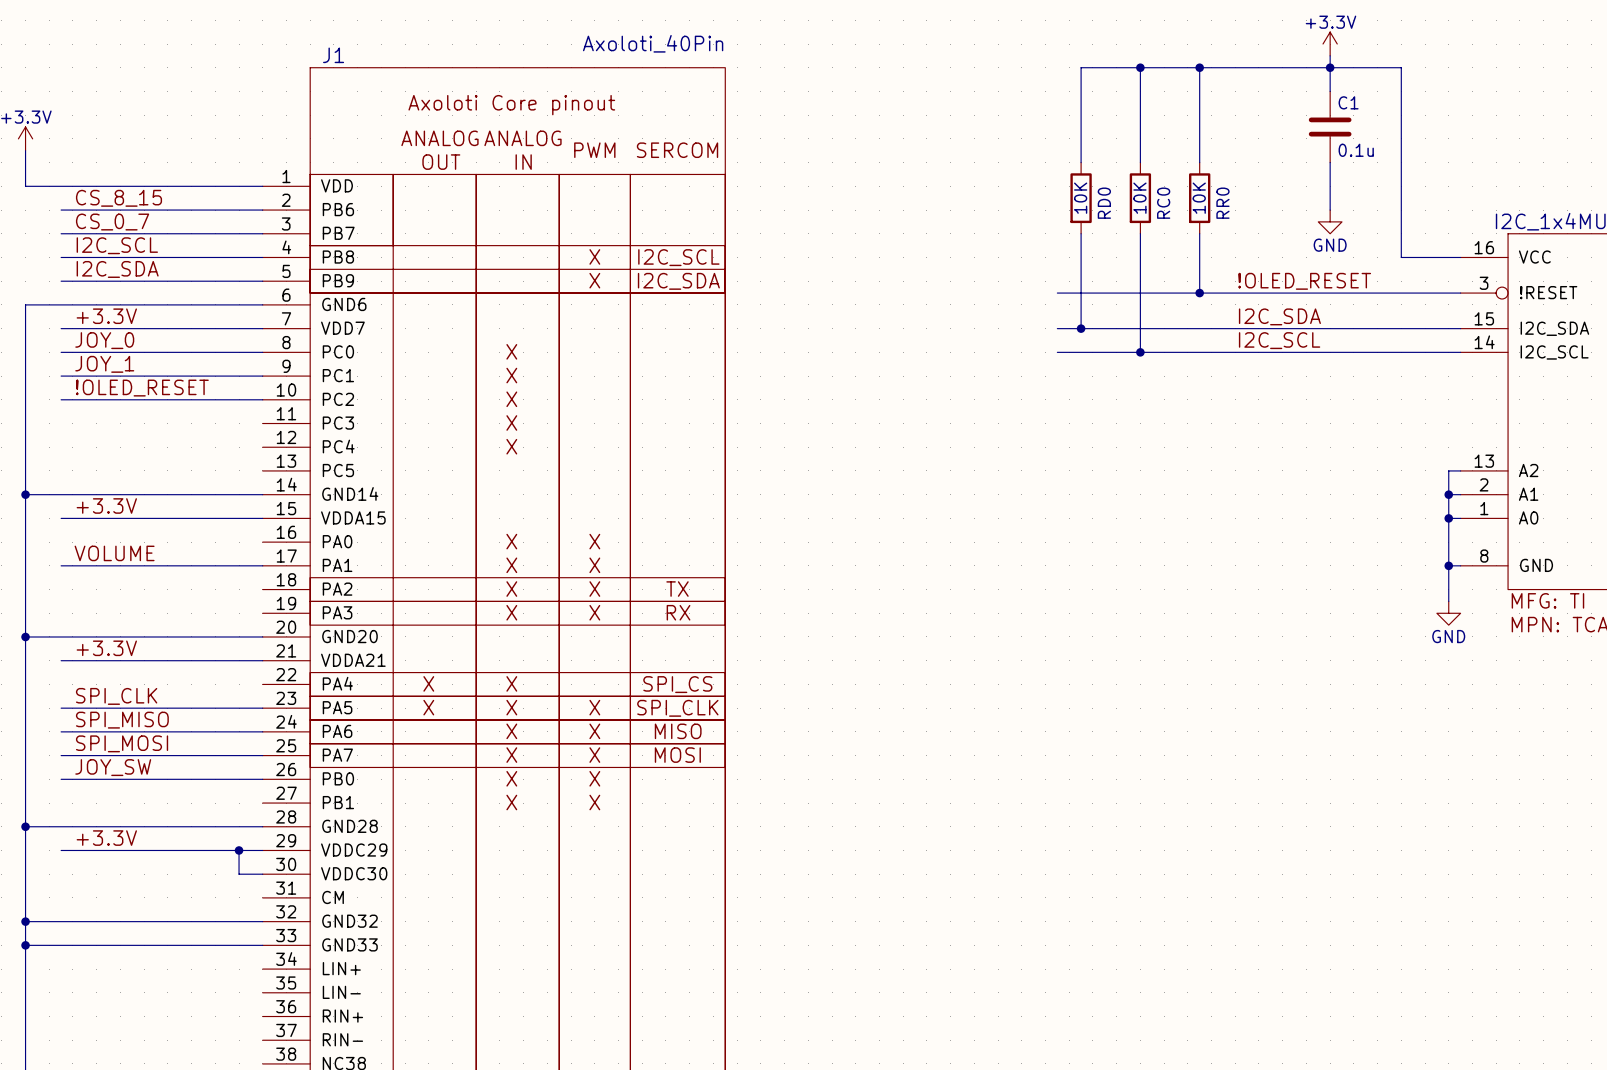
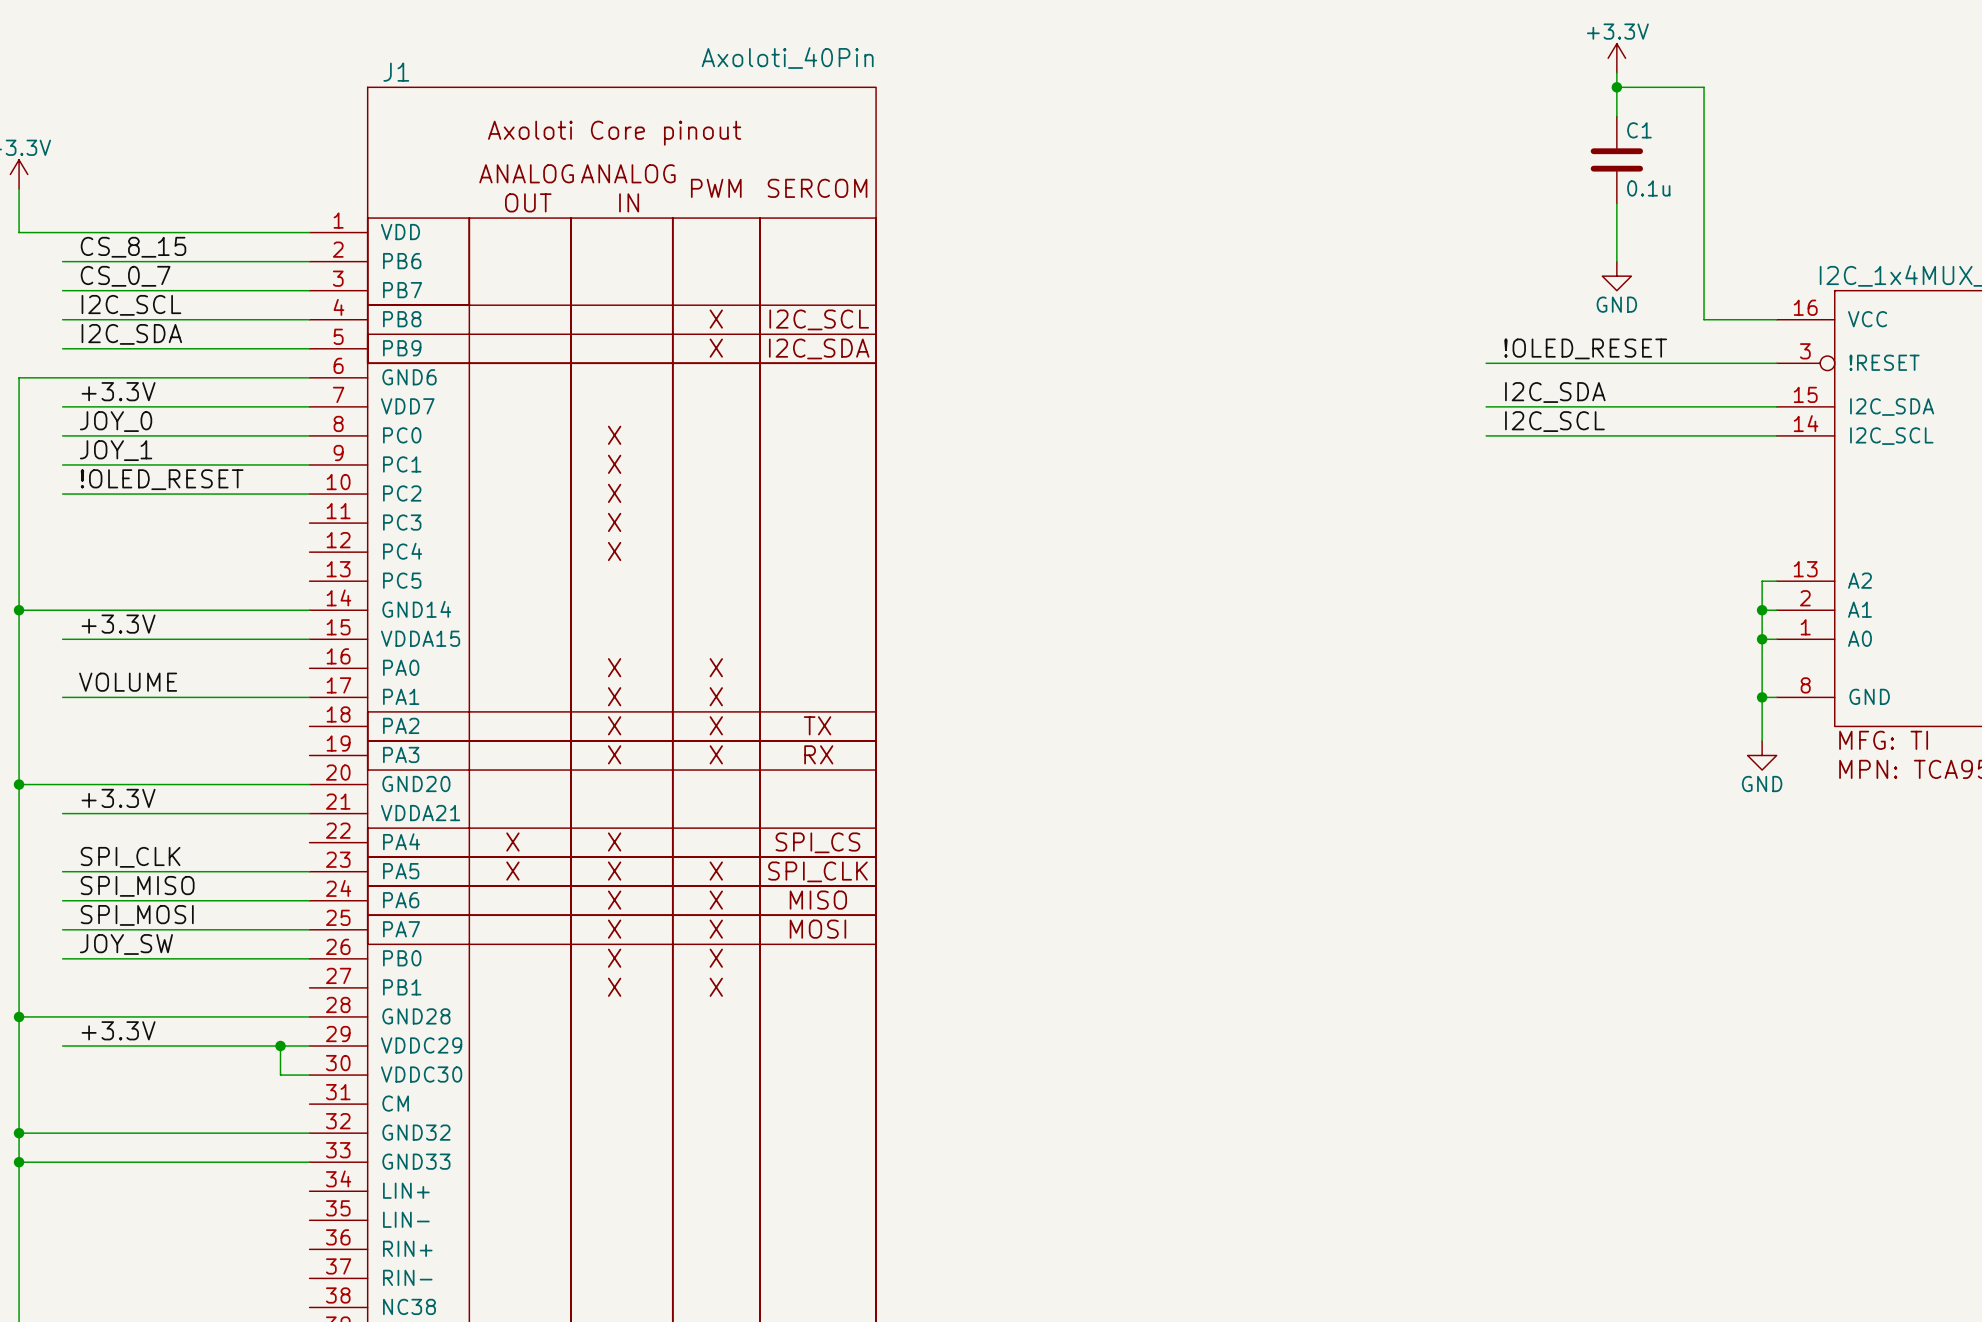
wire: (1140, 67) (1140, 162) -> none
junction: (1140, 67) -> none
wire: (1199, 67) (1199, 162) -> none
junction: (1199, 67) -> none
wire: (1330, 67) (1081, 67) (1081, 162) -> none
RD0: 10K (1081, 198) -> none
RC0: 10K (1140, 198) -> none
RR0: 10K (1199, 198) -> none
wire: (1081, 233) (1081, 328) -> none
wire: (1140, 233) (1140, 352) -> none
wire: (1199, 233) (1199, 293) -> none
wire: (1057, 293) (1223, 293) -> none
junction: (1199, 293) -> none
wire: (1057, 328) (1223, 328) -> none
junction: (1081, 328) -> none
wire: (1057, 352) (1223, 352) -> none
junction: (1140, 352) -> none

